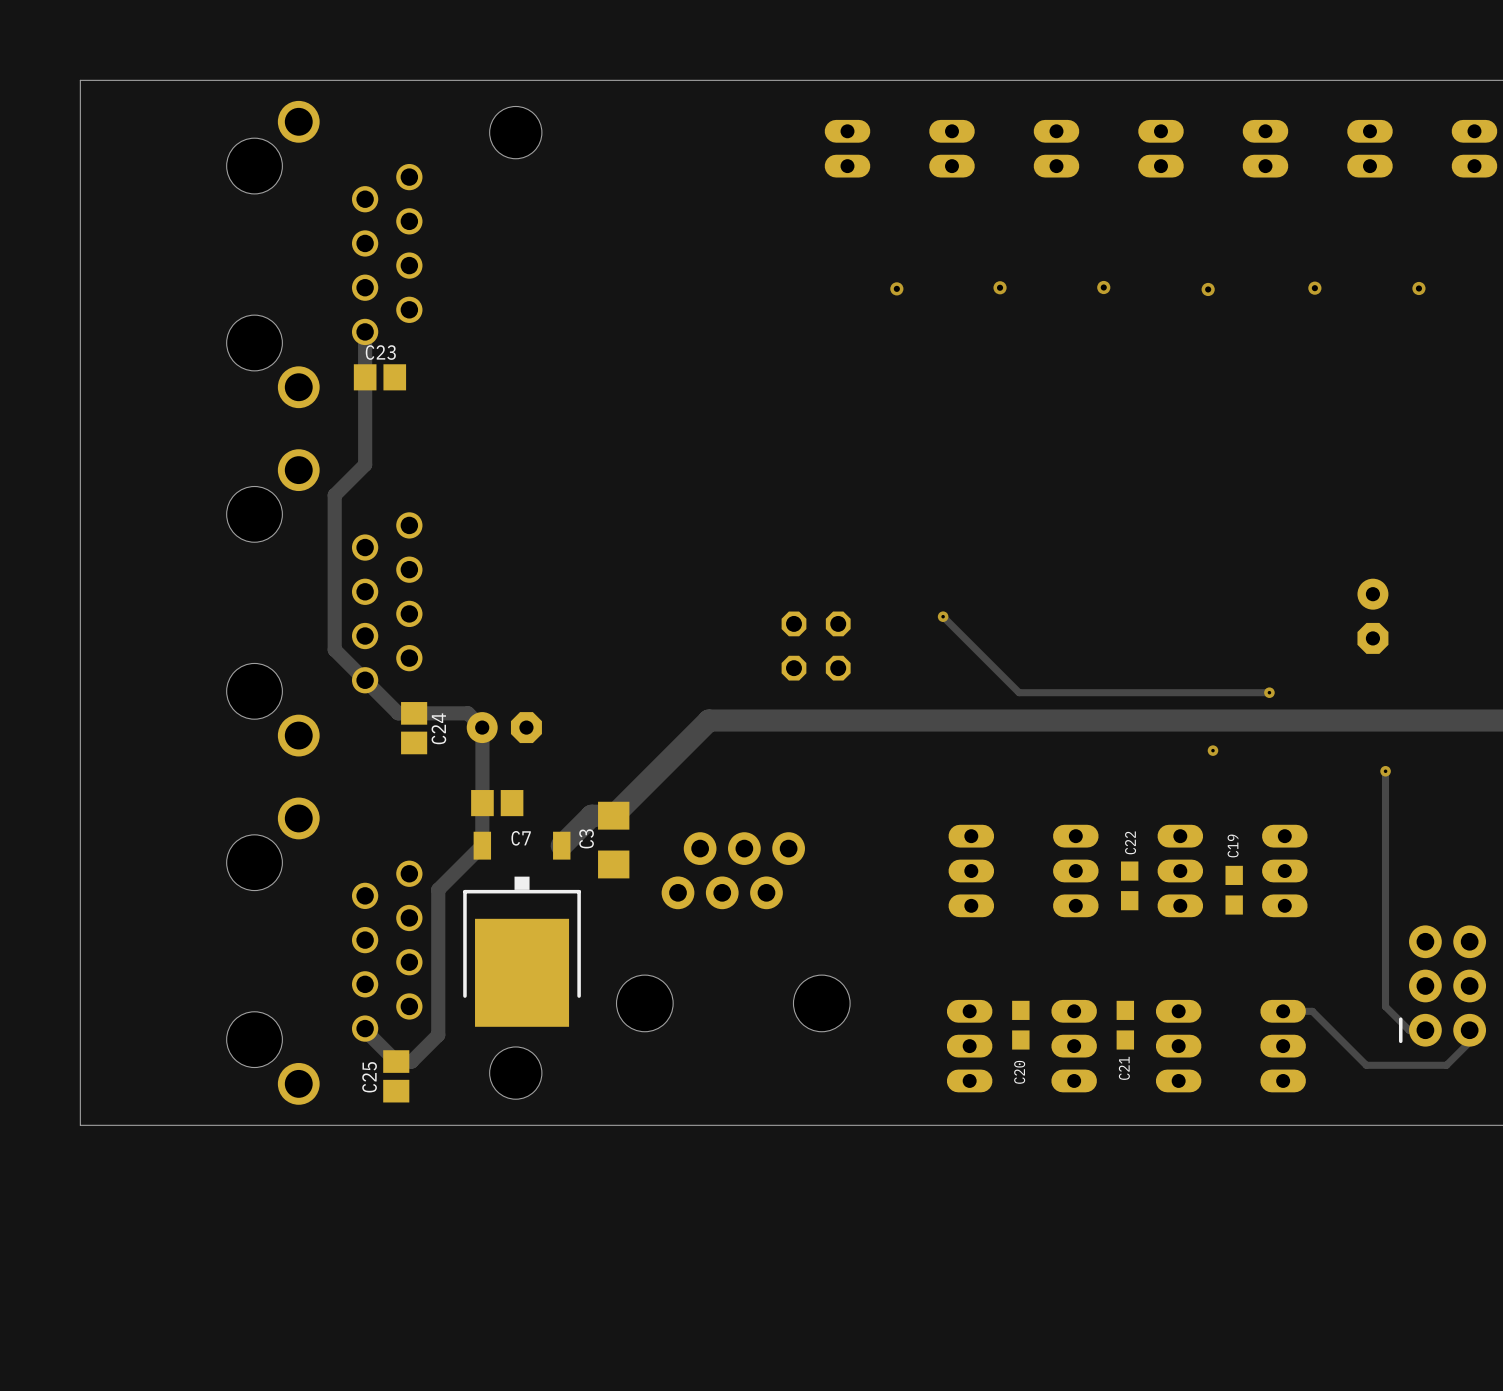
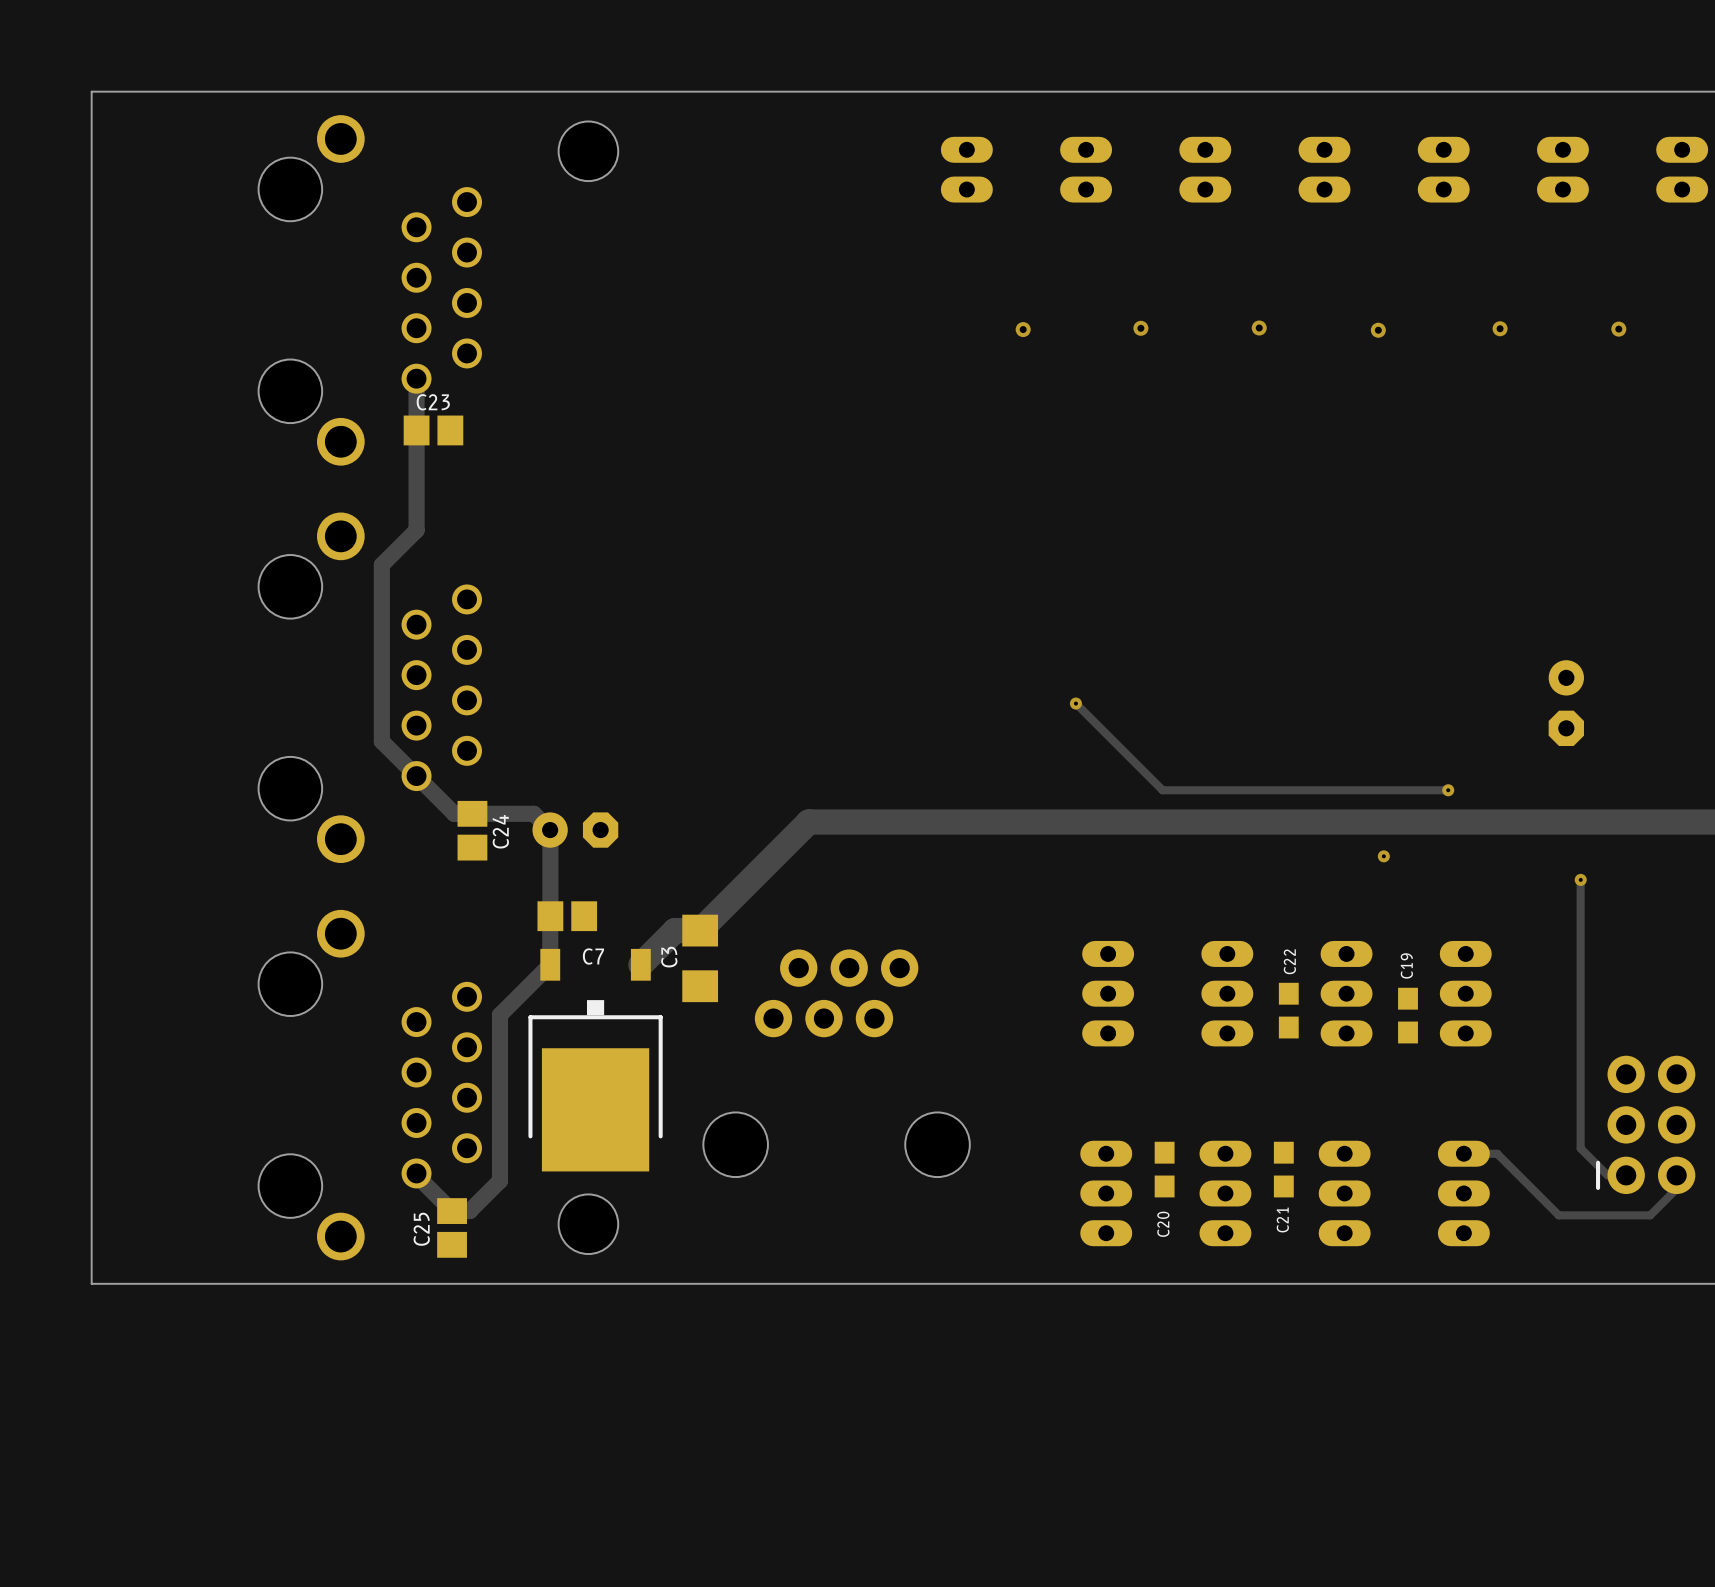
part: (816, 646) -> none

